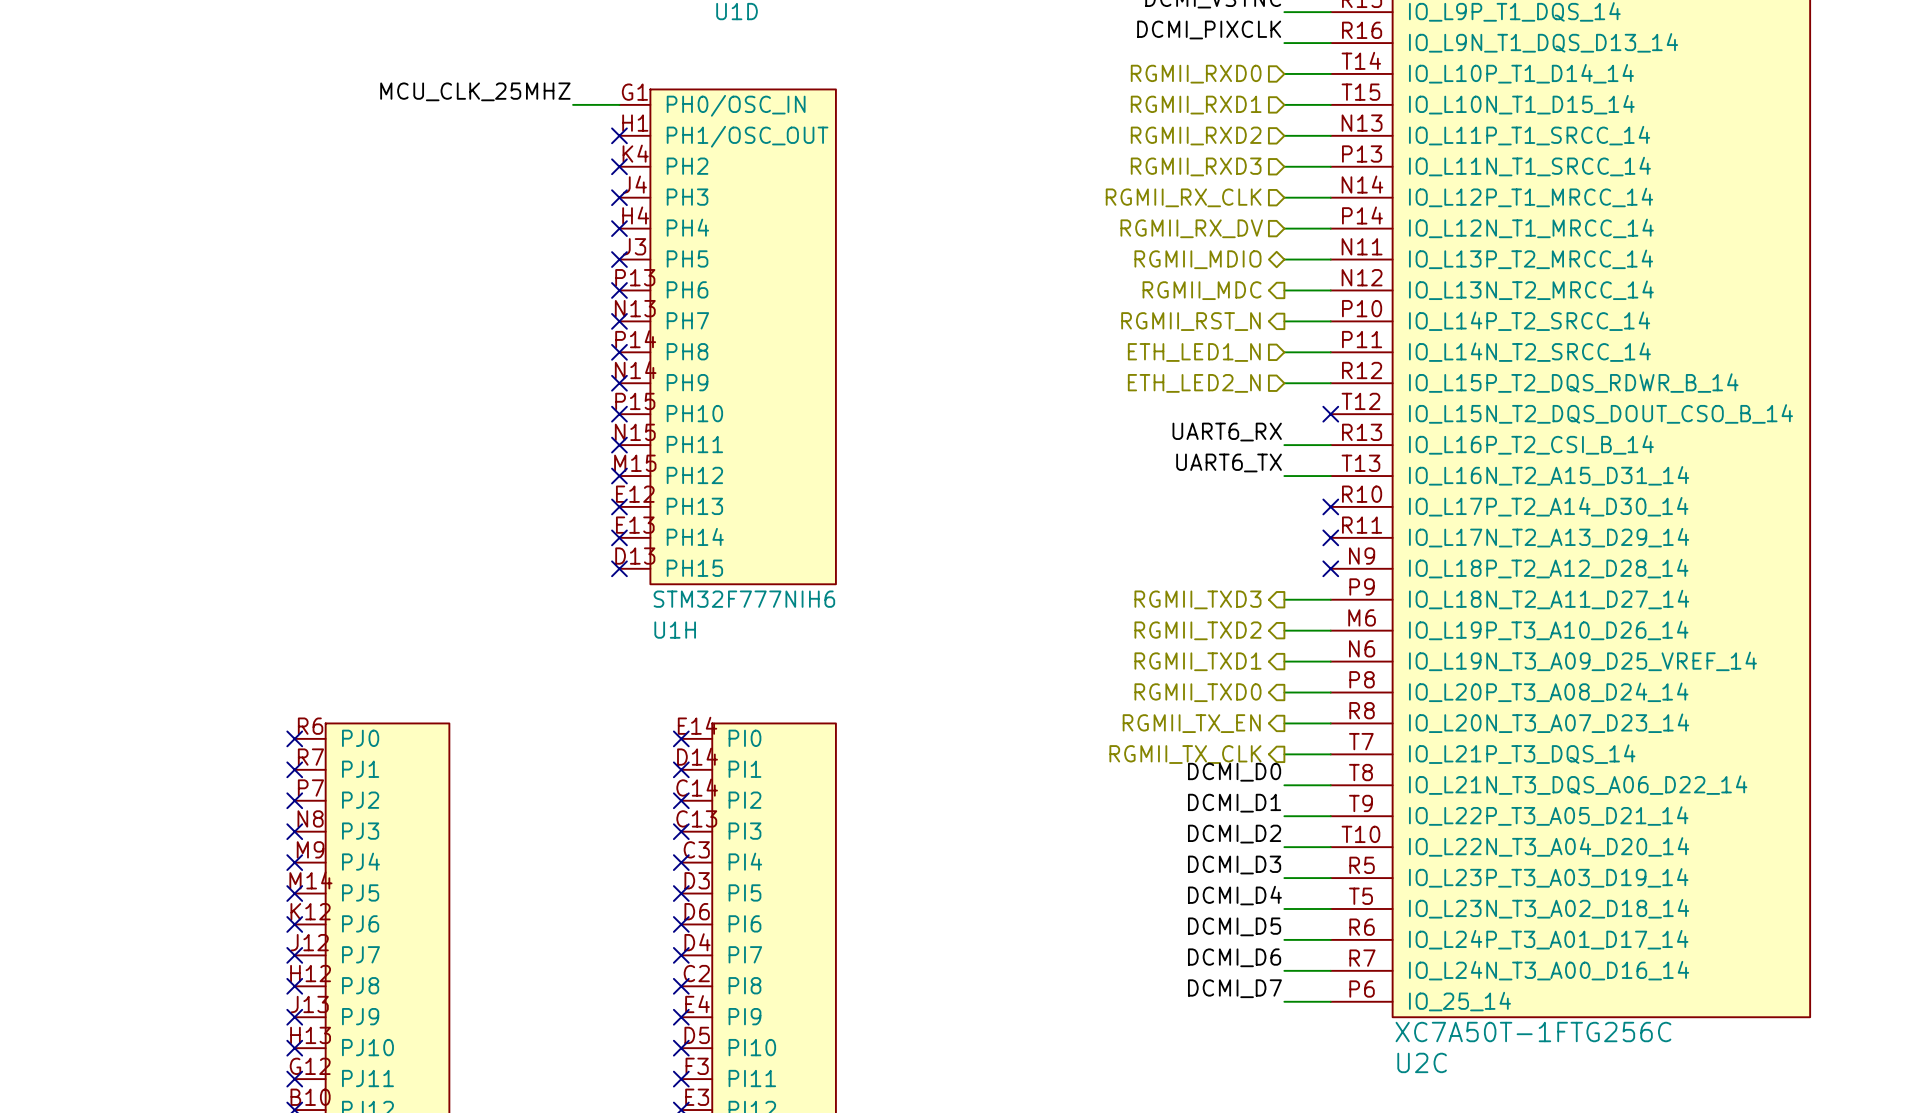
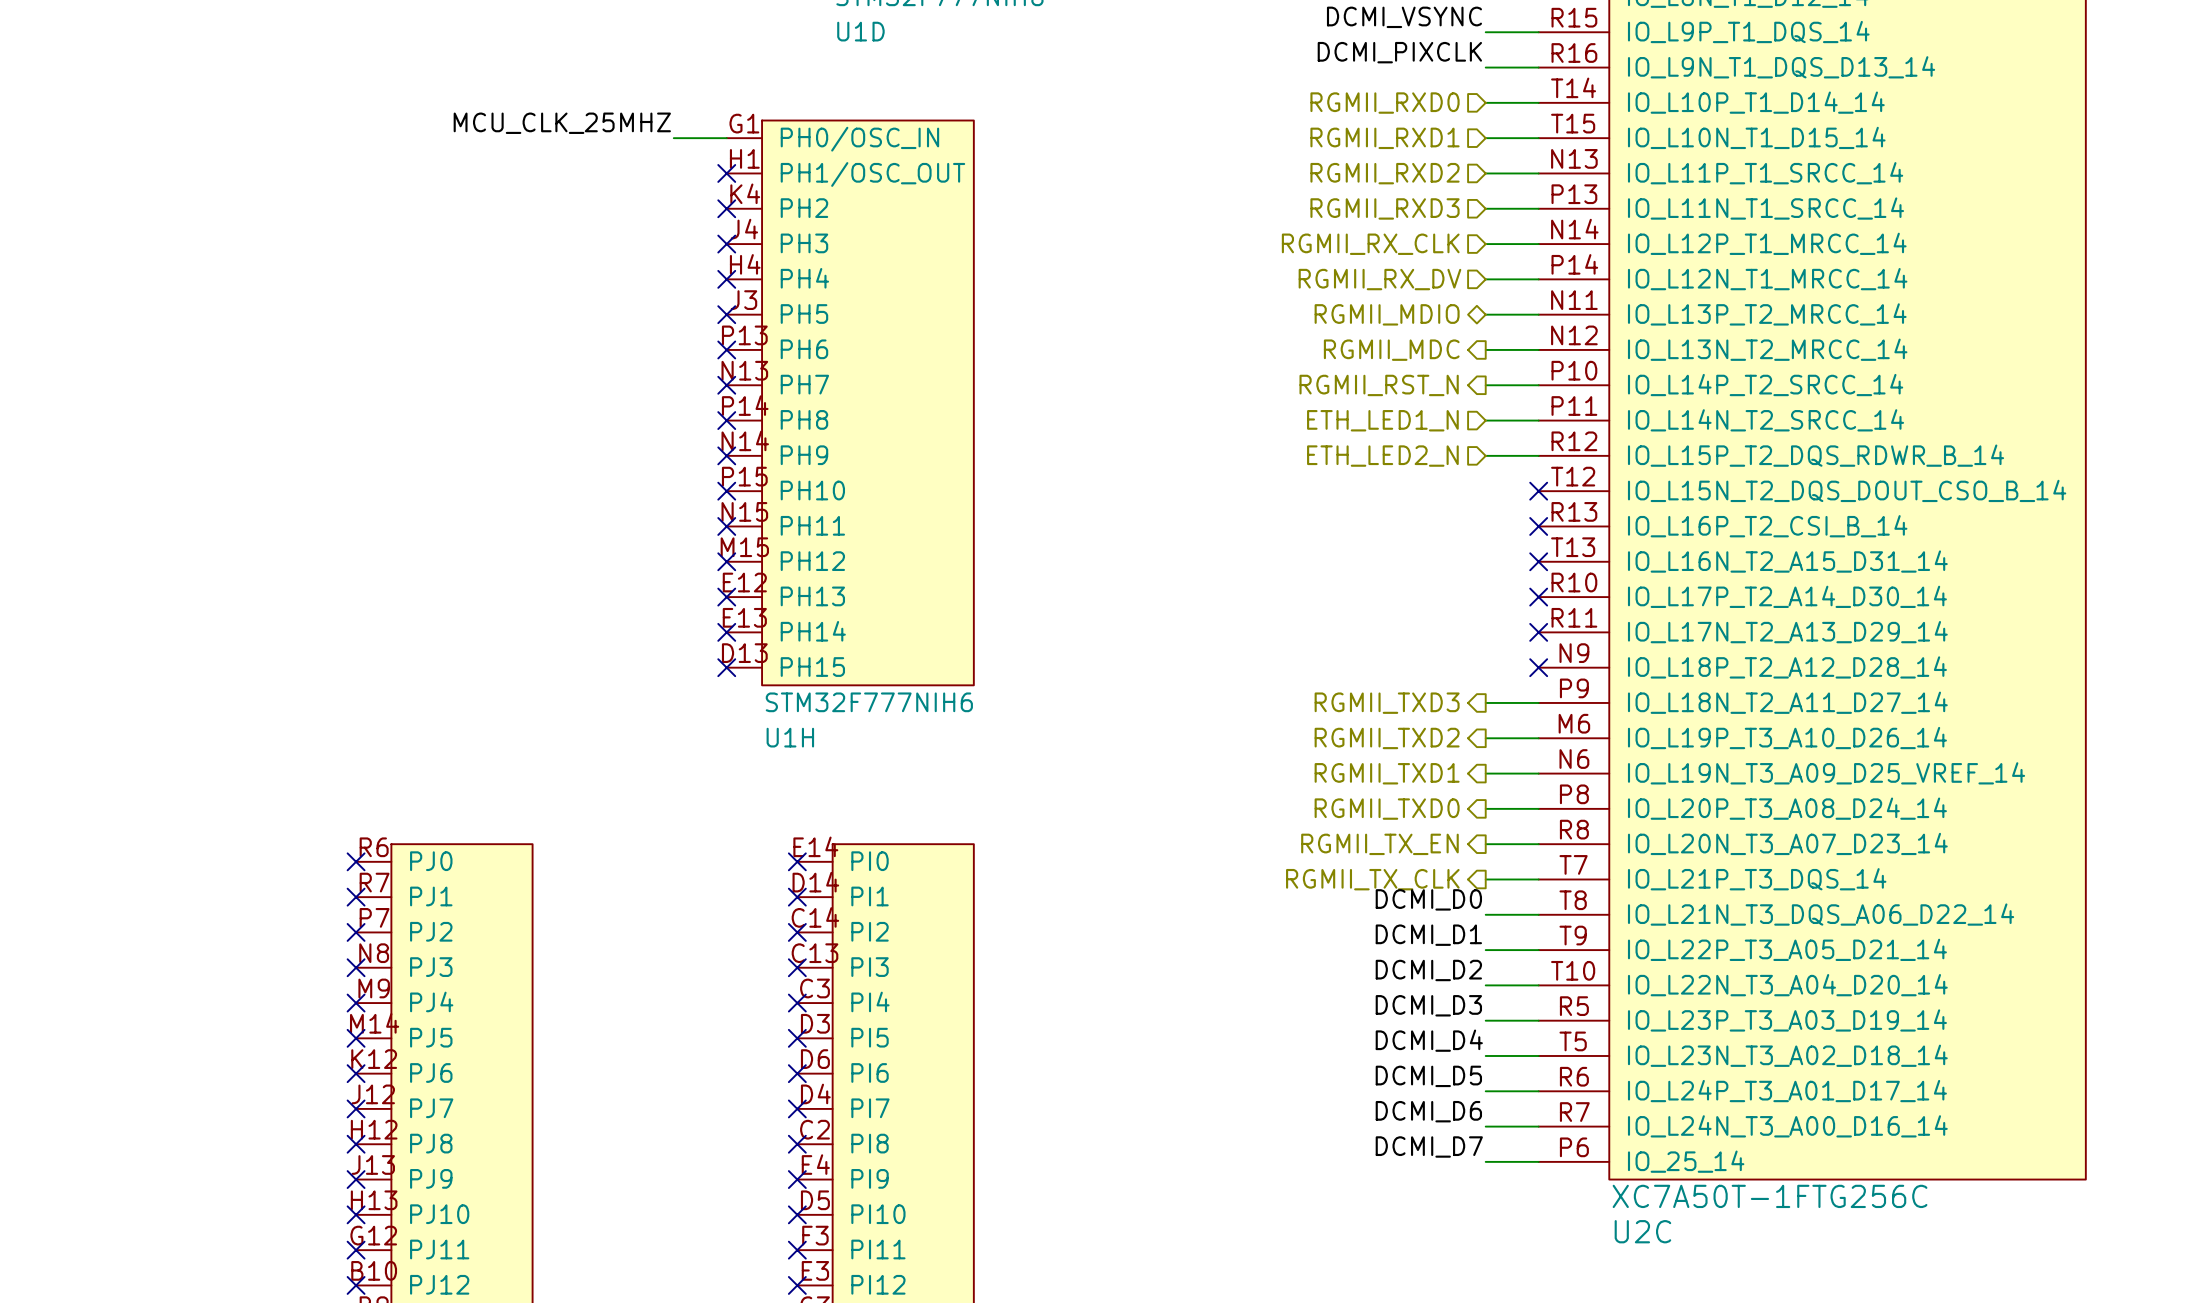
label: UART6_RX (1227, 432) -> none
wire: (1284, 445) (1330, 445) -> none
no-connect mark: none -> (1538, 526)
label: UART6_TX (1229, 462) -> none
wire: (1284, 476) (1330, 476) -> none
no-connect mark: none -> (1538, 561)

